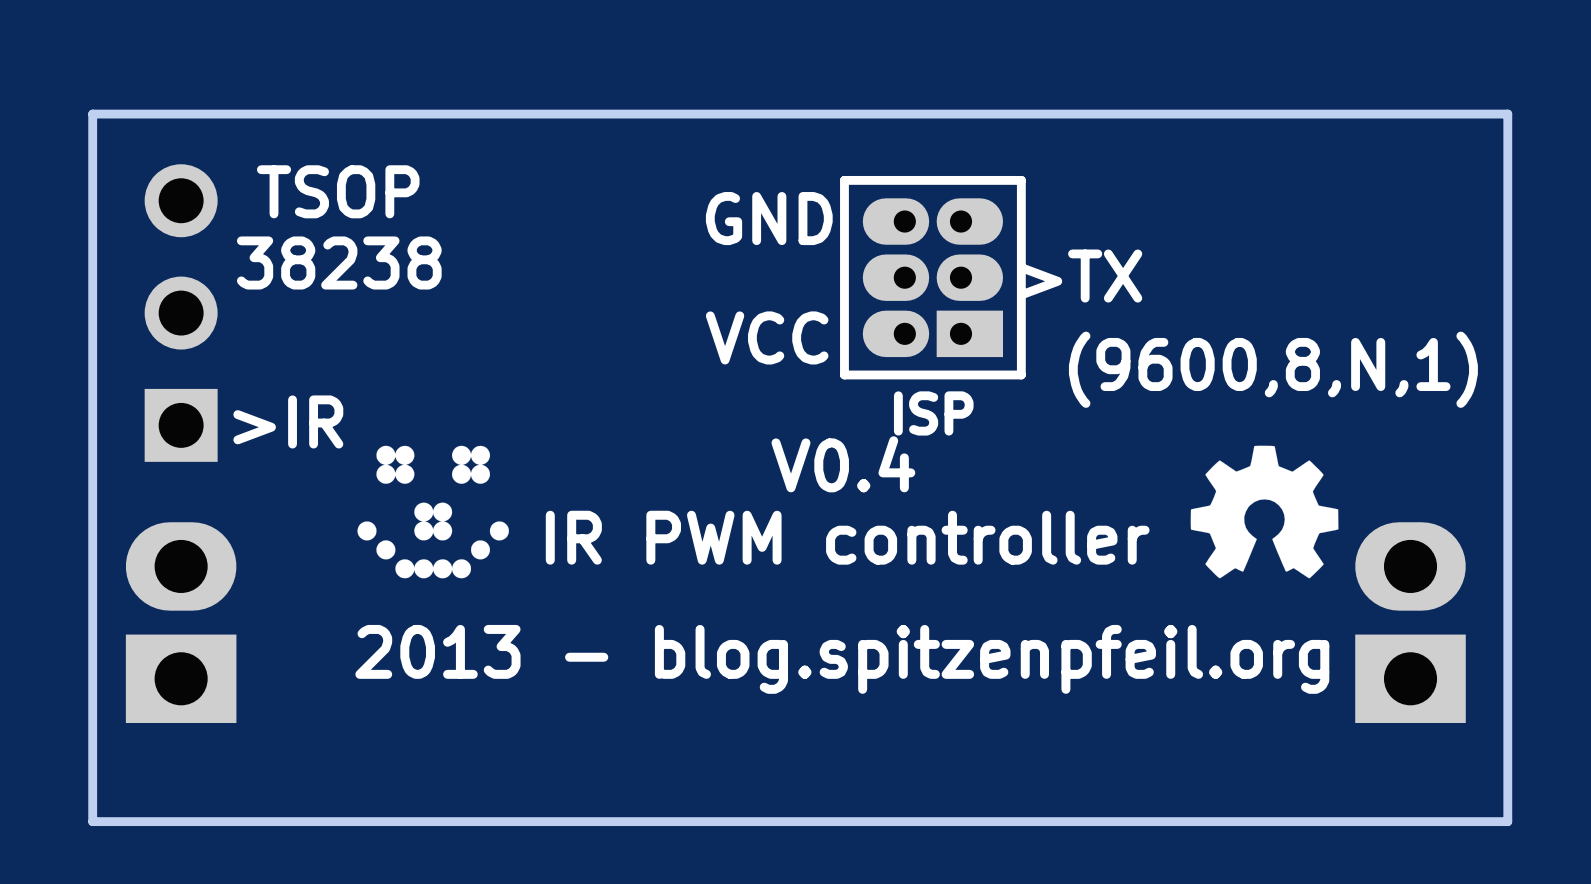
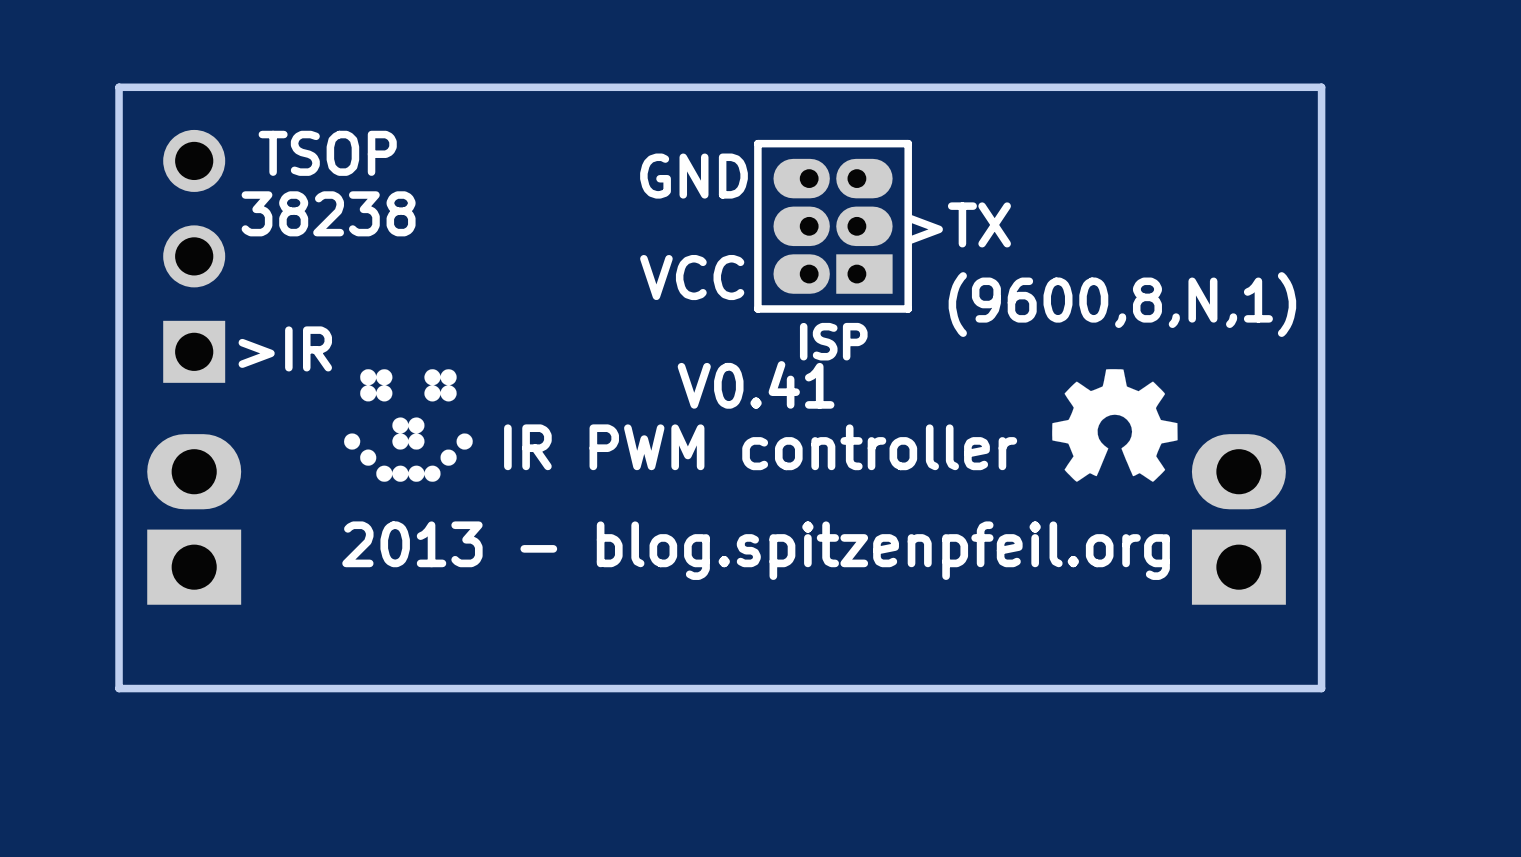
text: V0.4 (843, 464) -> V0.41 (756, 384)

